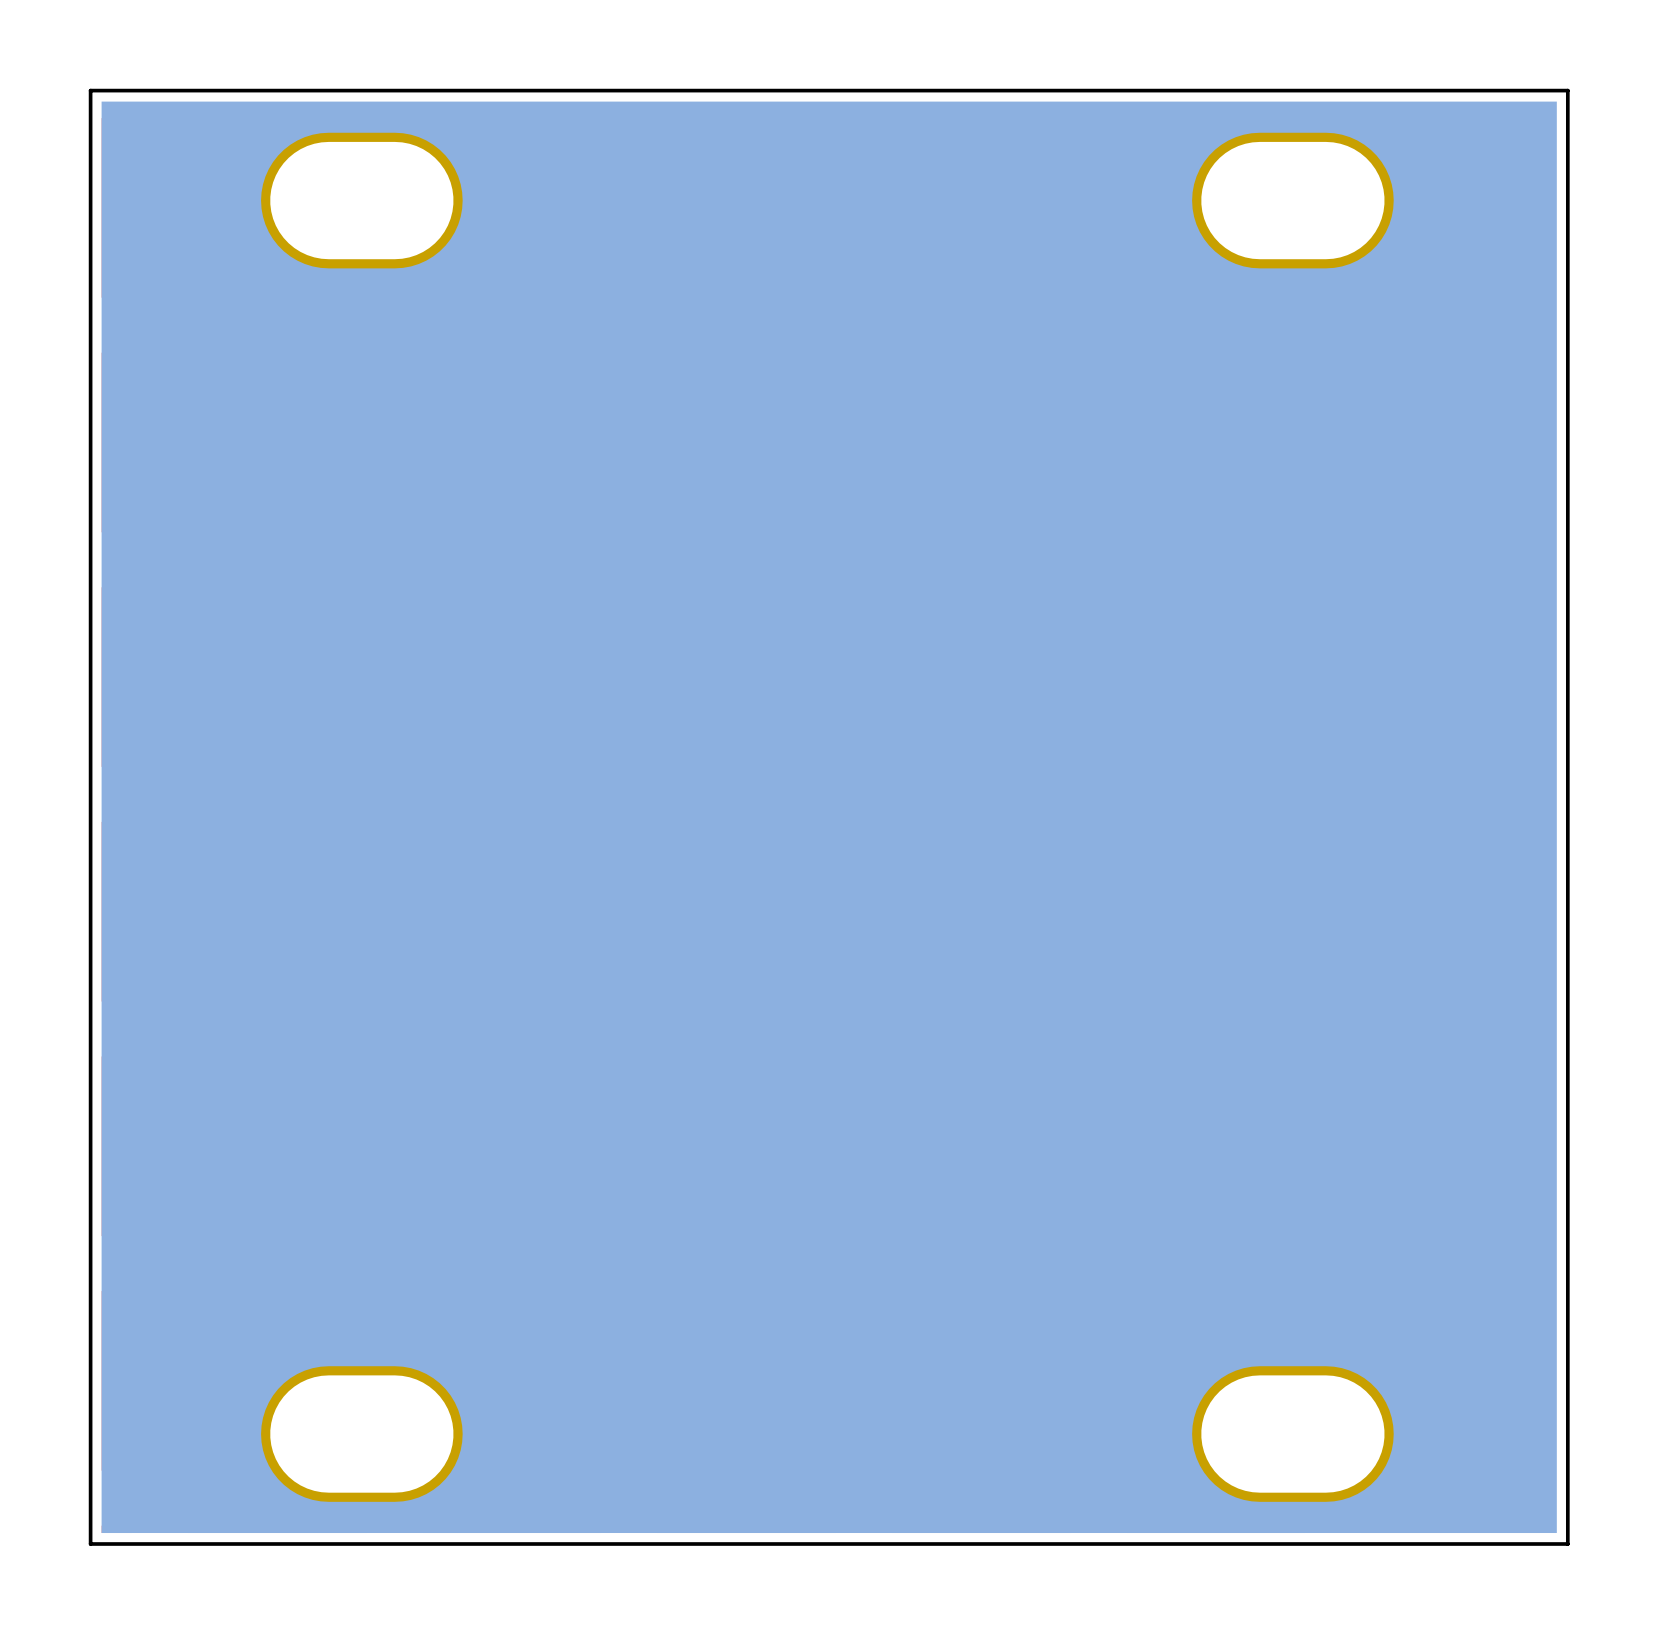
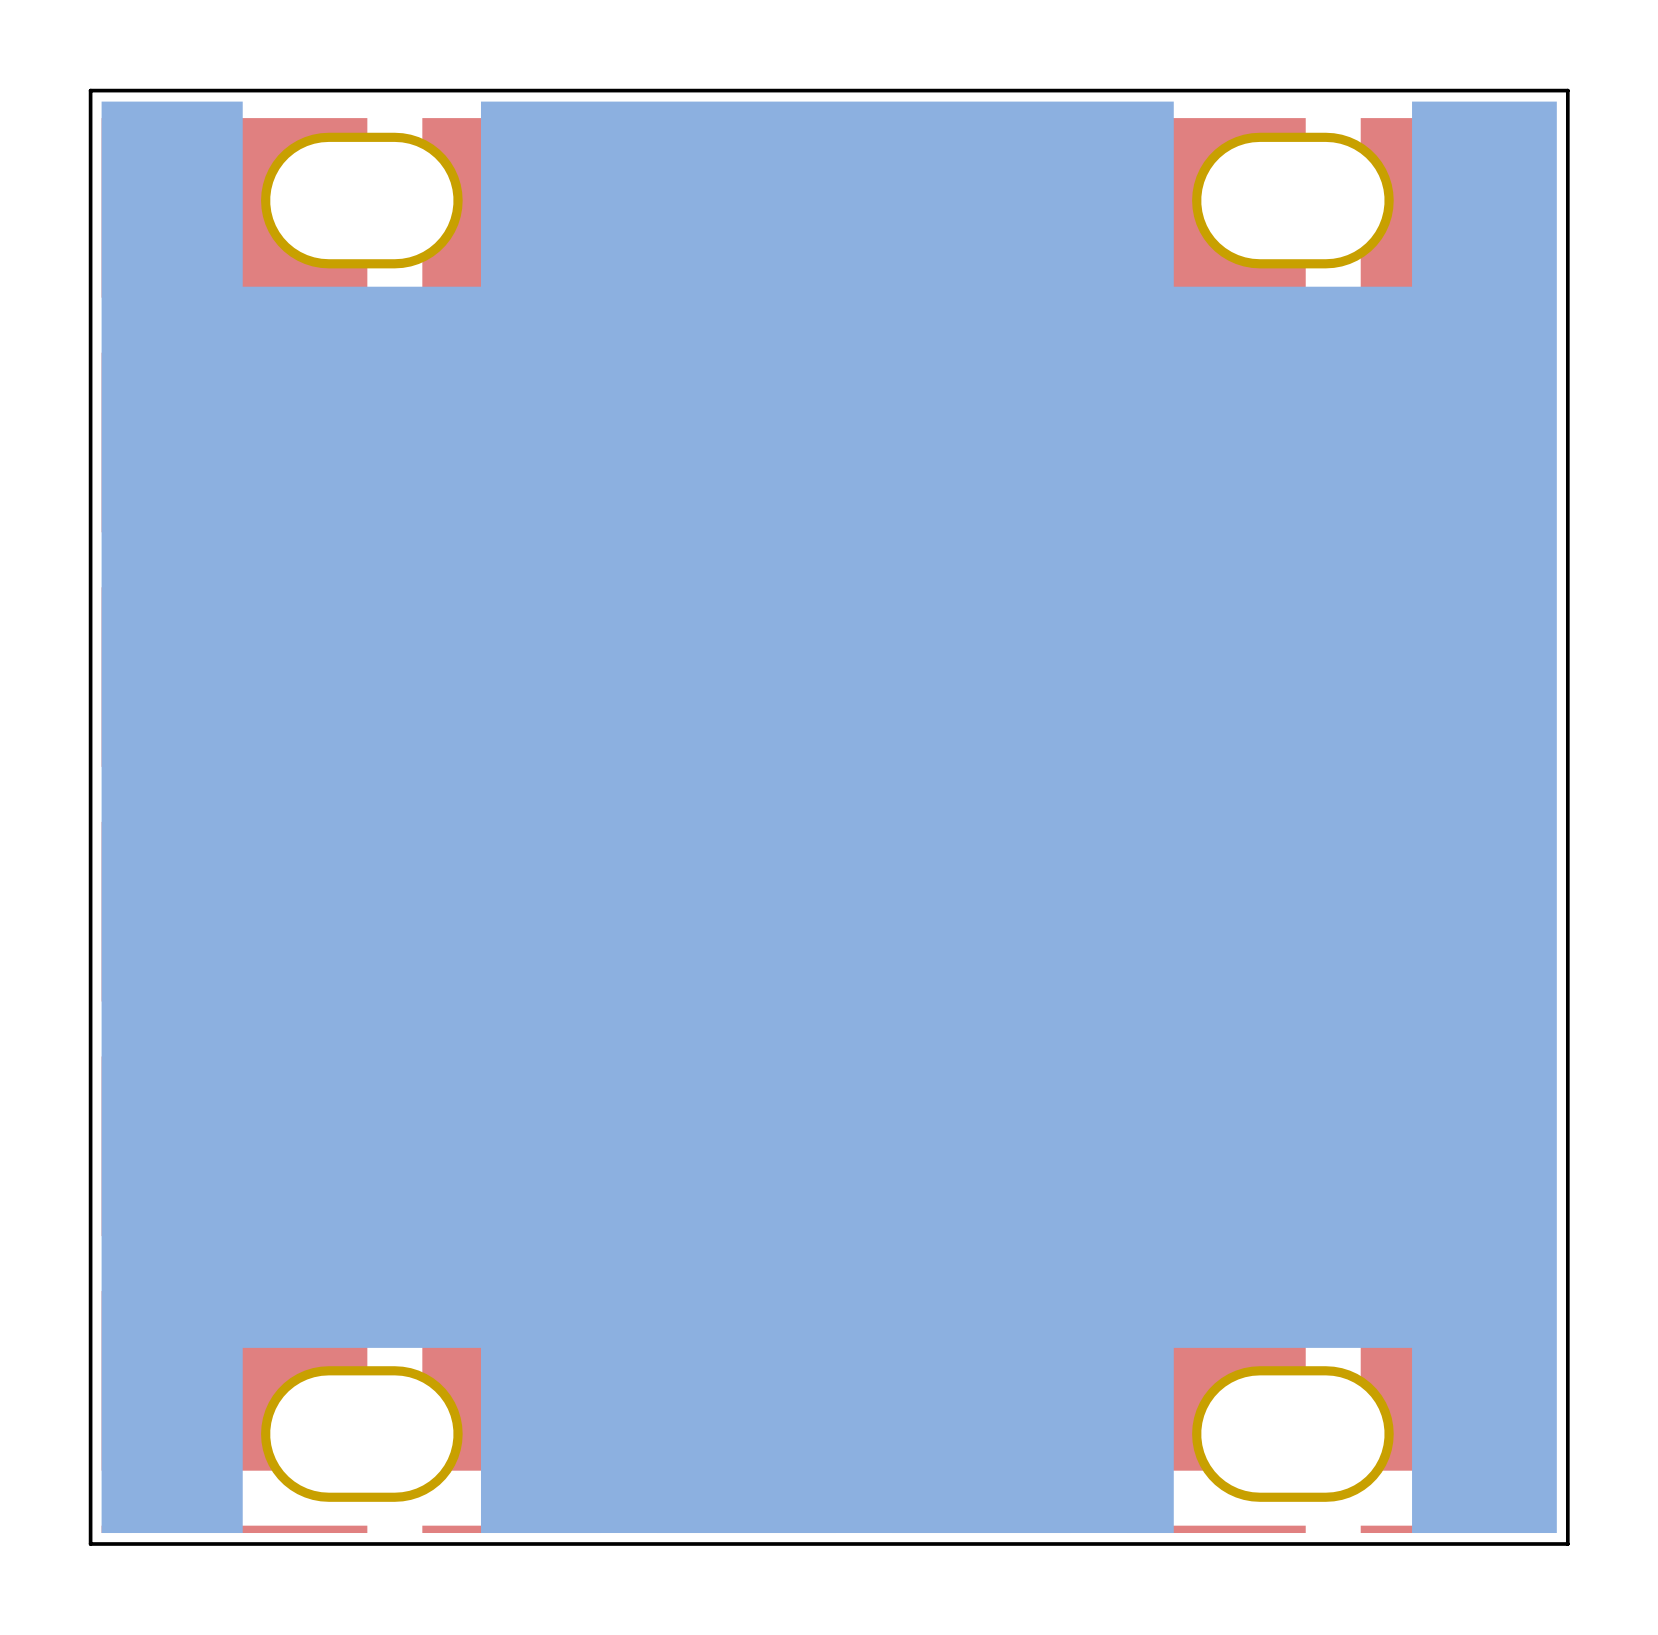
drawing shape: [101, 101, 1557, 1534] -> [242, 286, 1413, 1348]
drawing: none -> [101, 101, 243, 1534]
drawing: none -> [480, 101, 1174, 287]
drawing: none -> [1412, 101, 1557, 1534]
drawing: none -> [480, 1347, 1174, 1534]

